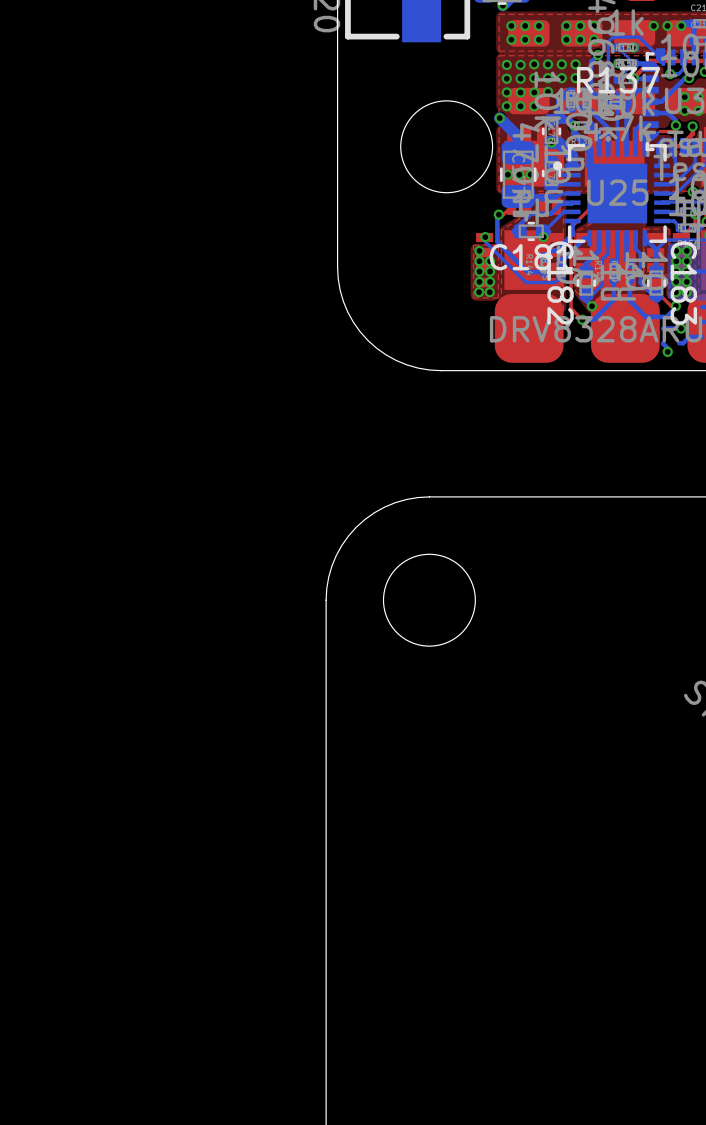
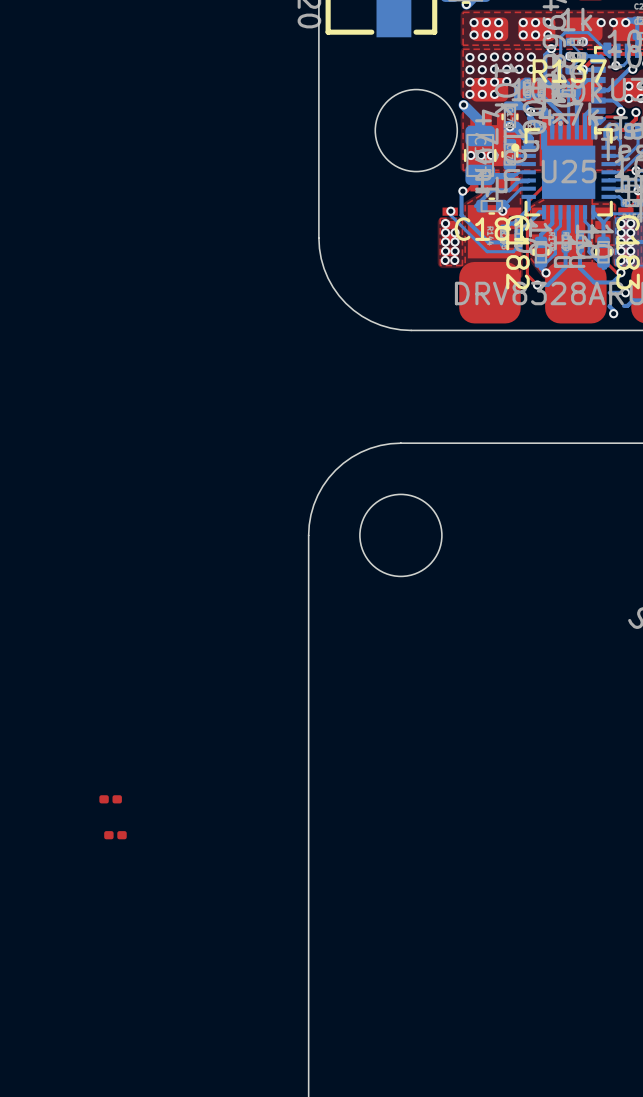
part: none -> (110, 799)
part: none -> (115, 835)

